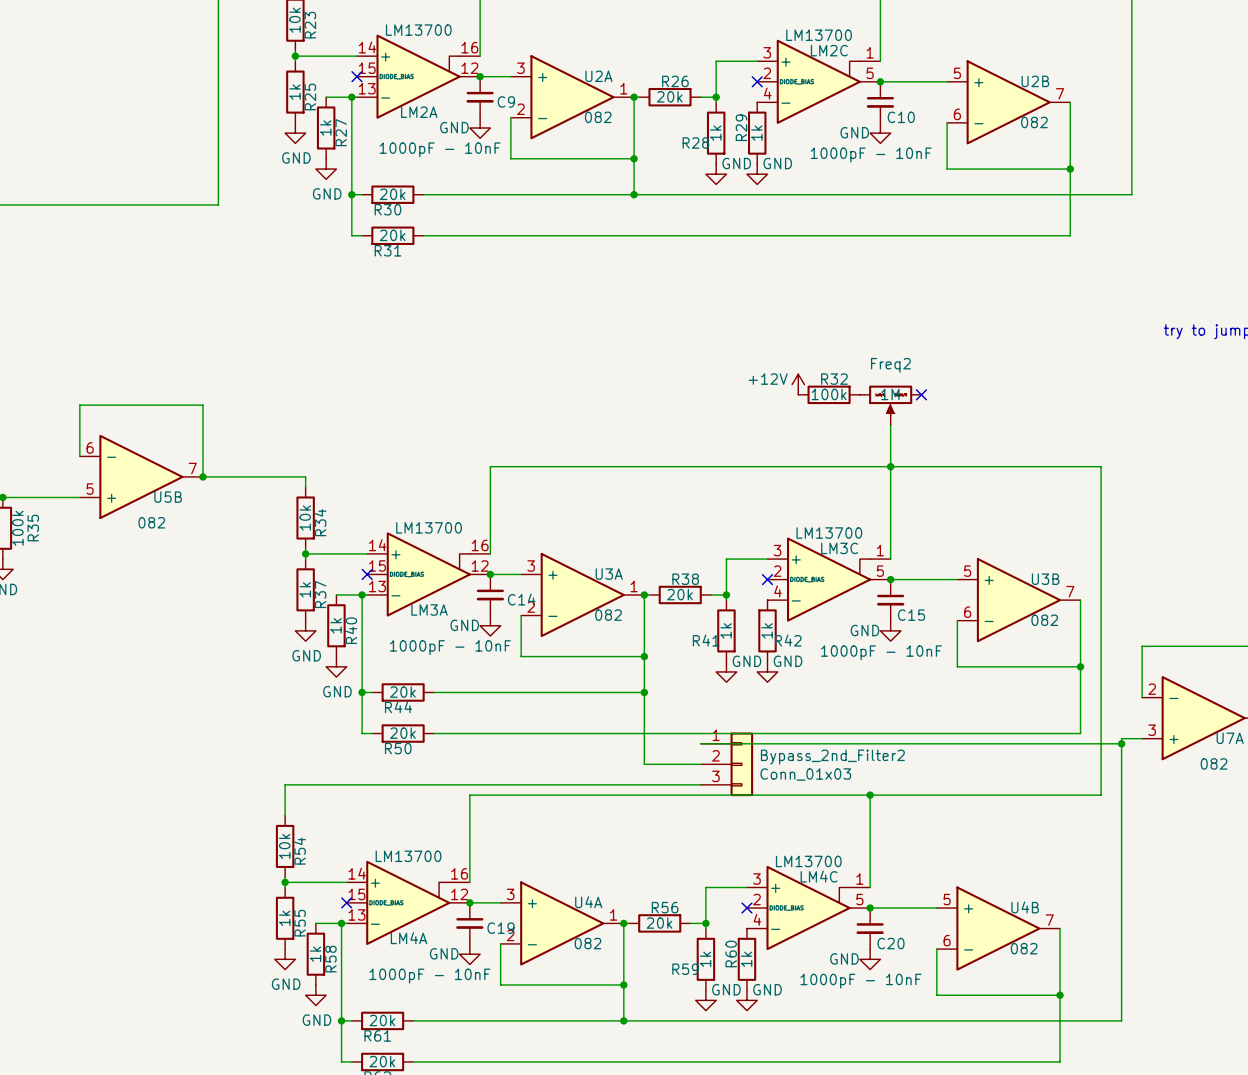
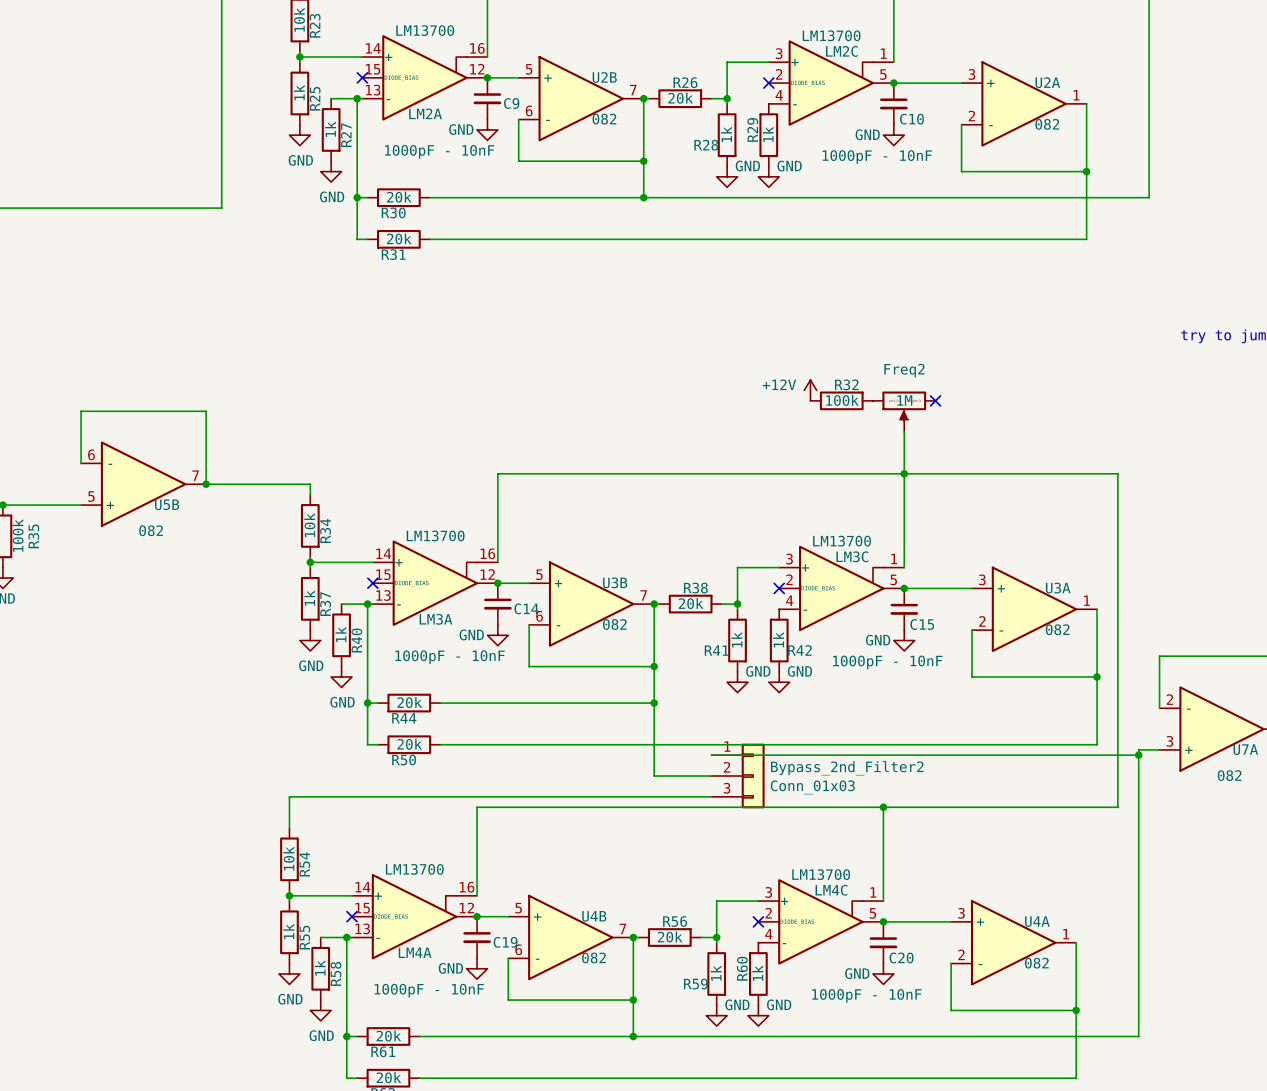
U2A position: (572, 97) -> (1024, 103)
U2B position: (1008, 102) -> (581, 98)
U3A position: (582, 594) -> (1034, 609)
U3B position: (1018, 600) -> (591, 604)
U4A position: (562, 923) -> (1013, 942)
U4B position: (998, 928) -> (570, 937)

